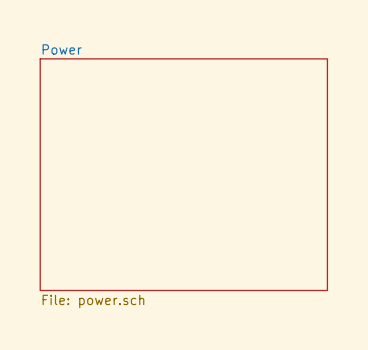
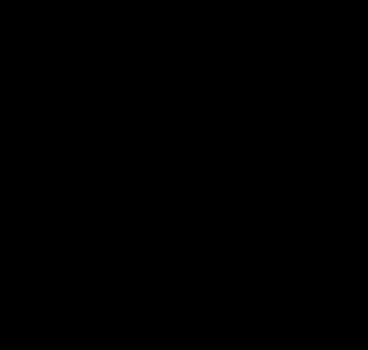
sheet Power: File: power.sch (183, 174) -> none

